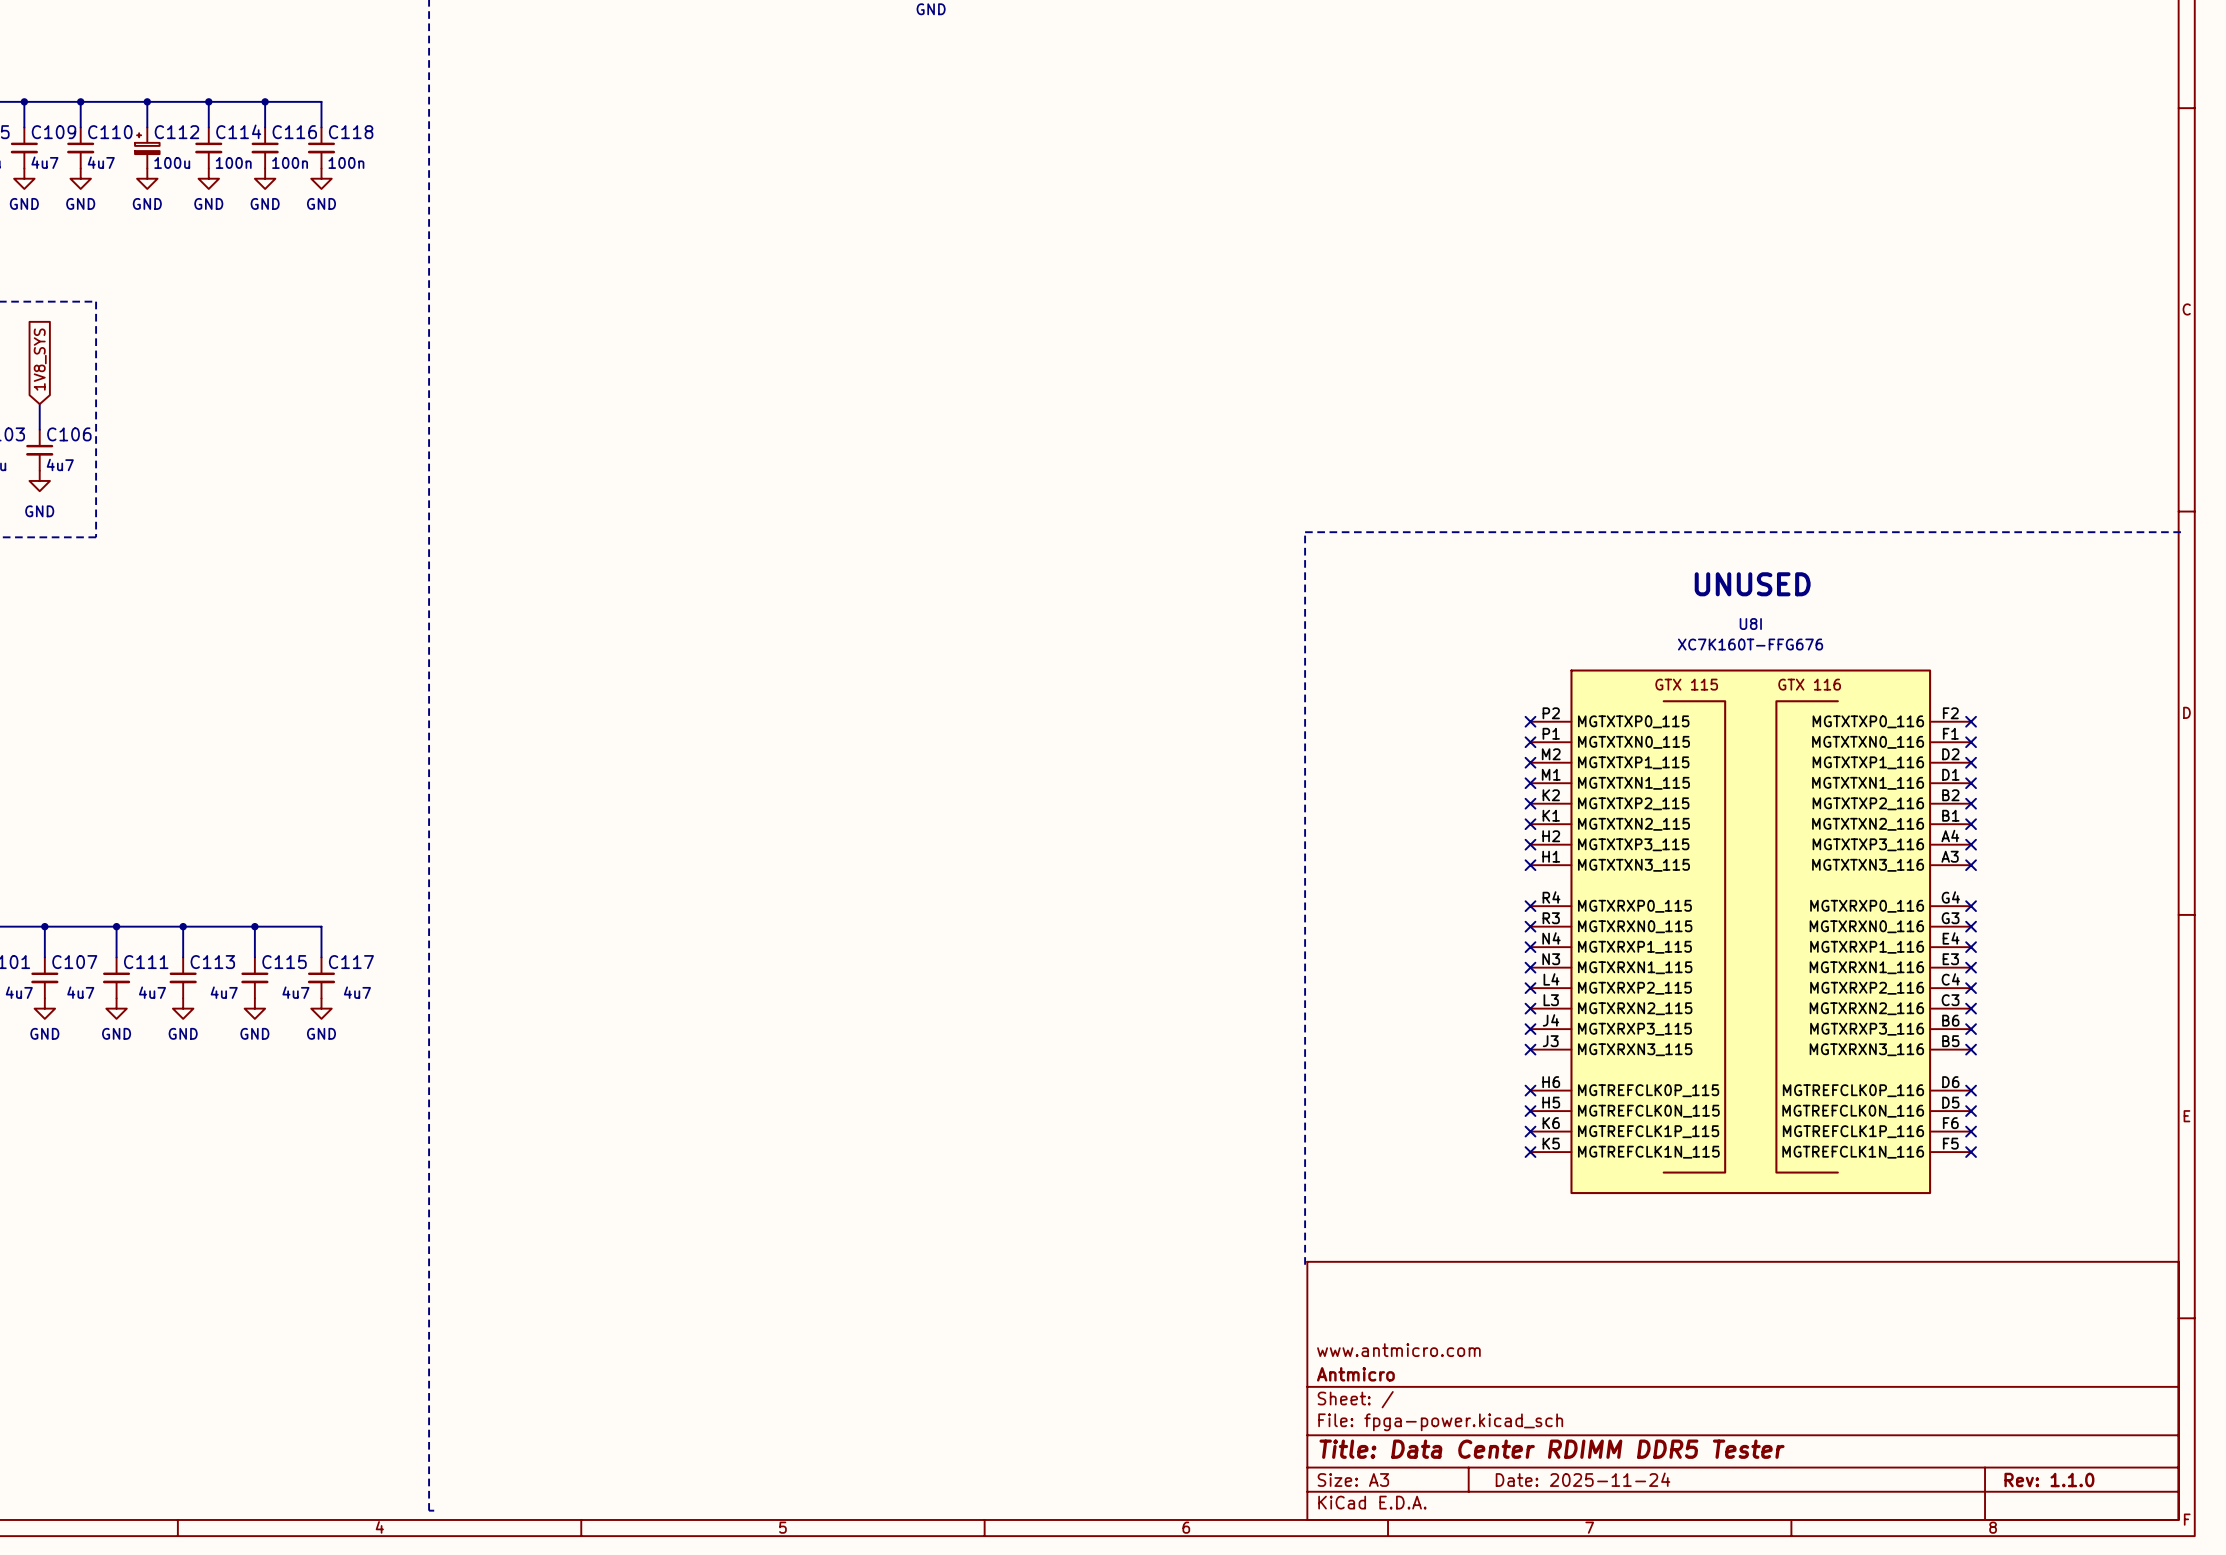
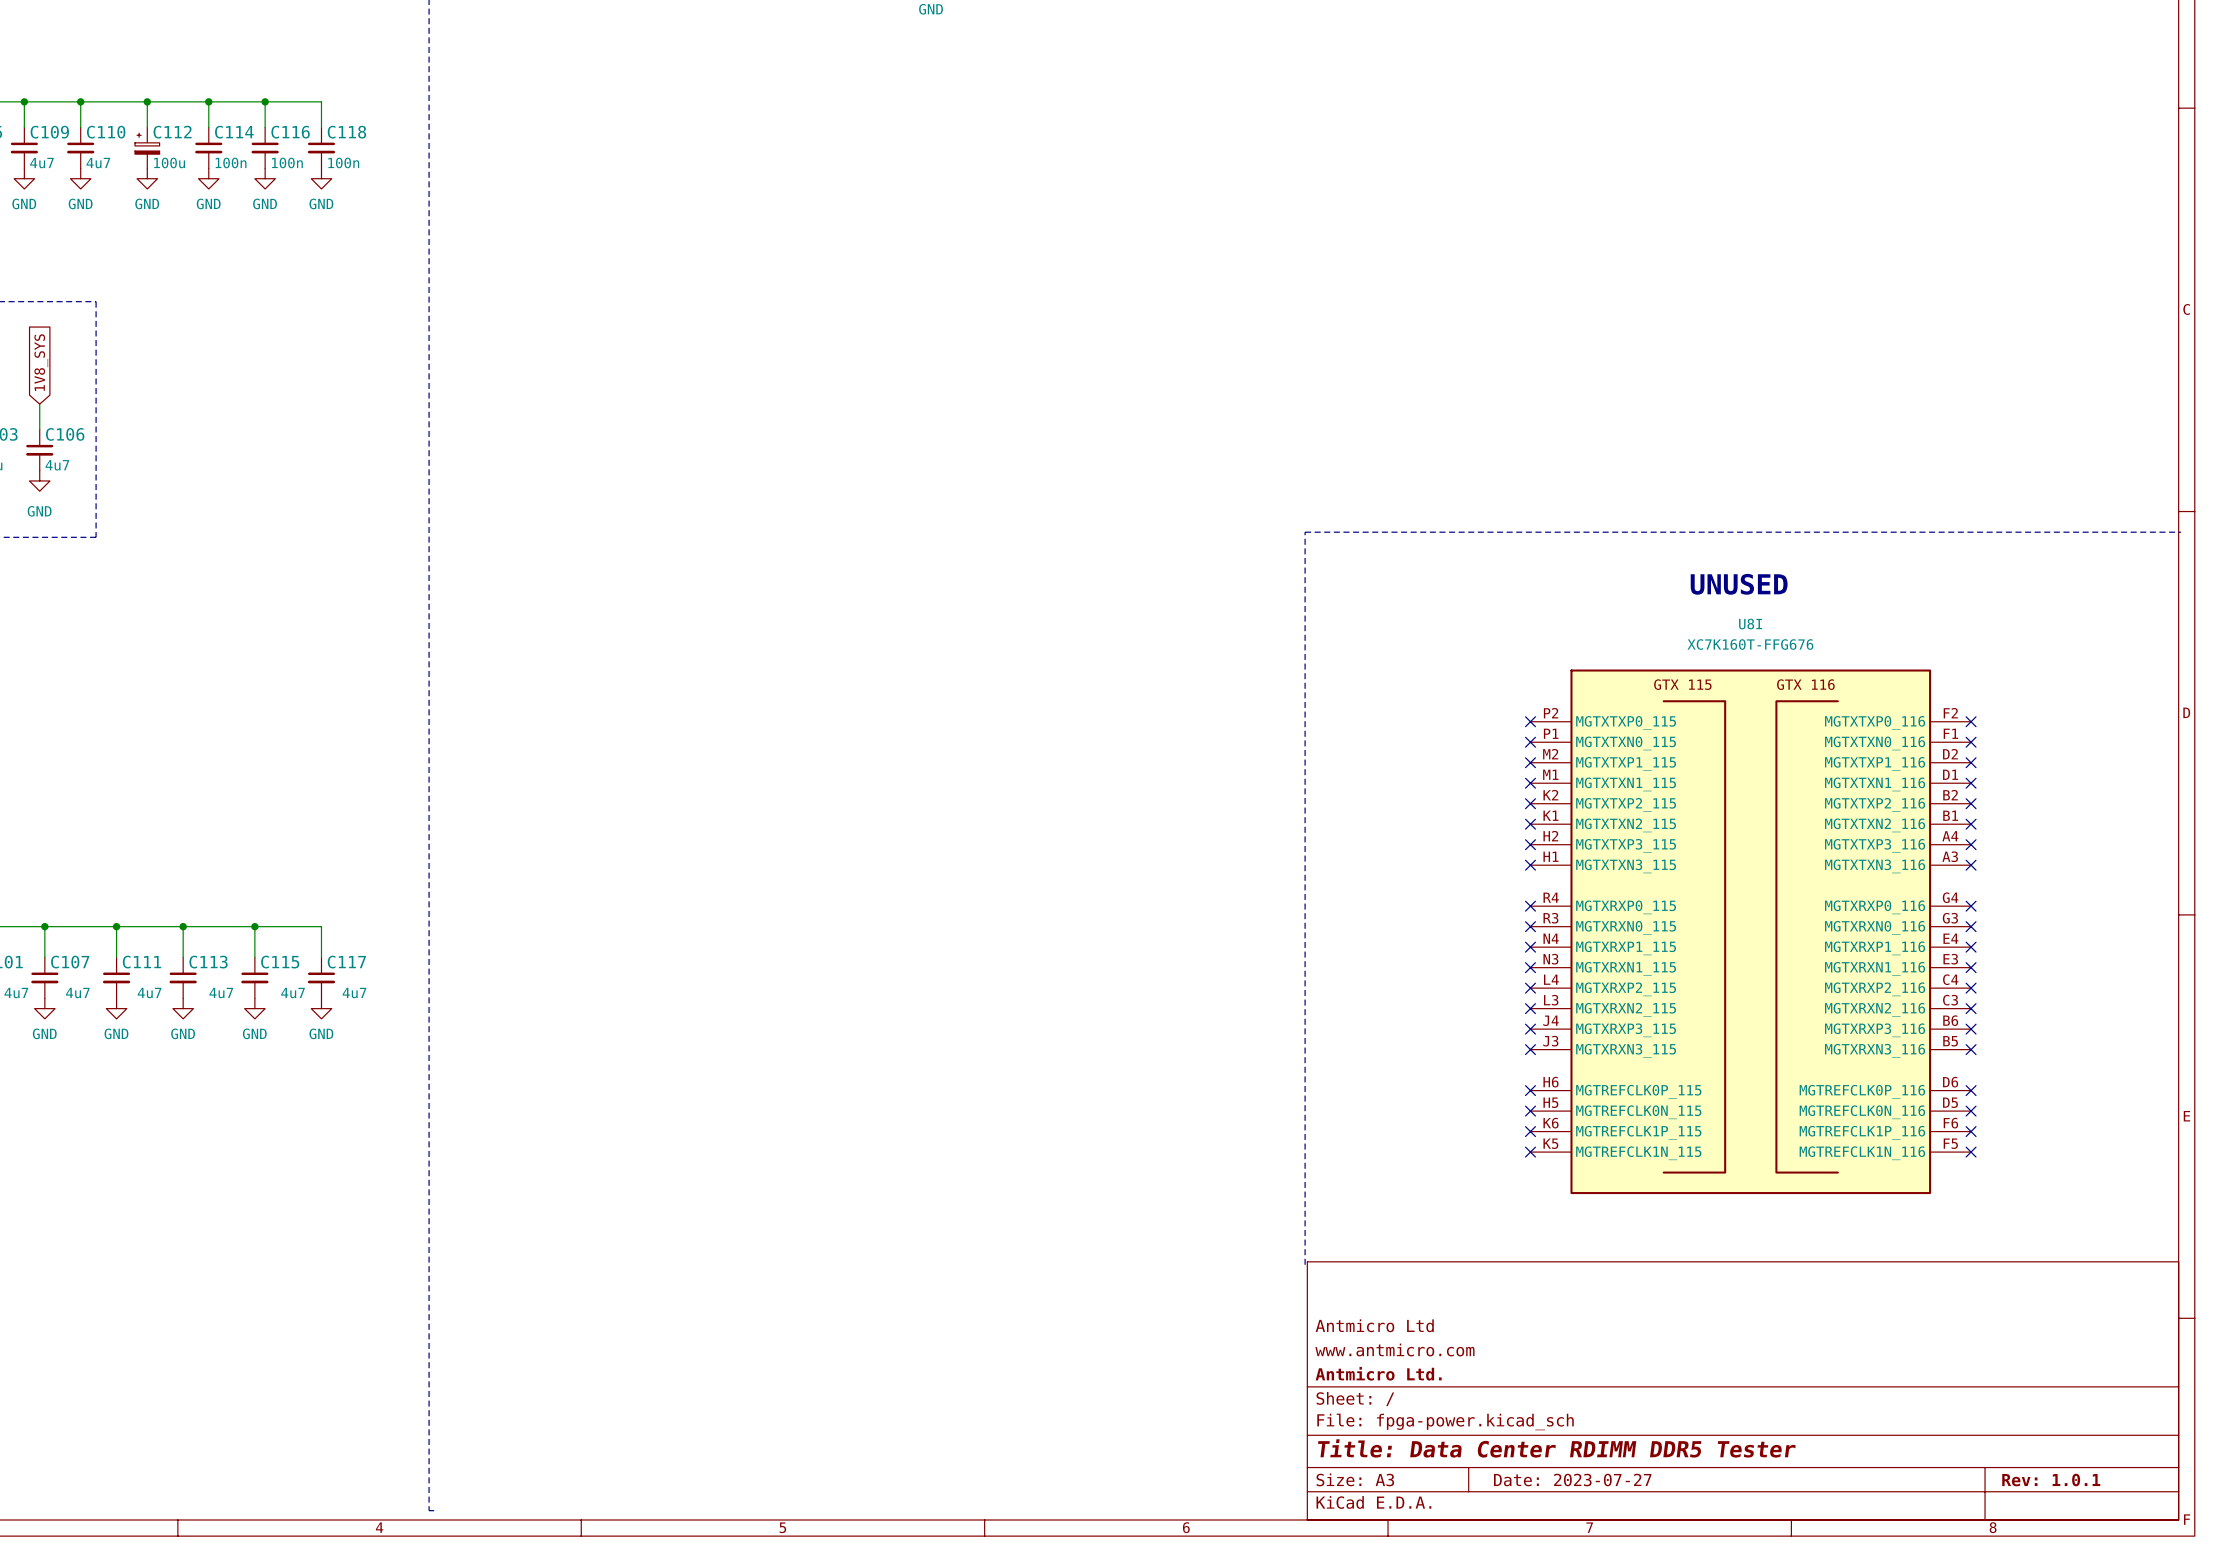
title block: none -> Antmicro Ltd (1374, 1325)
title block: Antmicro (1355, 1374) -> Antmicro Ltd. (1378, 1373)
title block: Date: 2025-11-24 (1583, 1479) -> Date: 2023-07-27 (1572, 1480)
title block: Rev: 1.1.0 (2049, 1480) -> Rev: 1.0.1 (2051, 1480)

